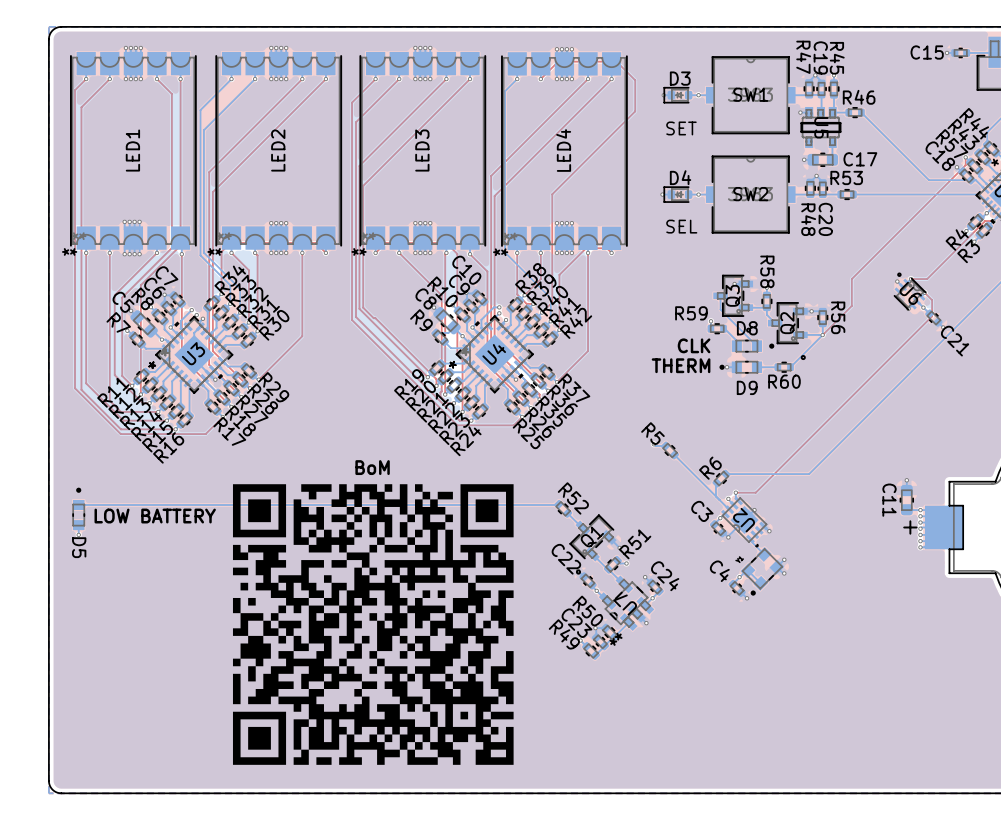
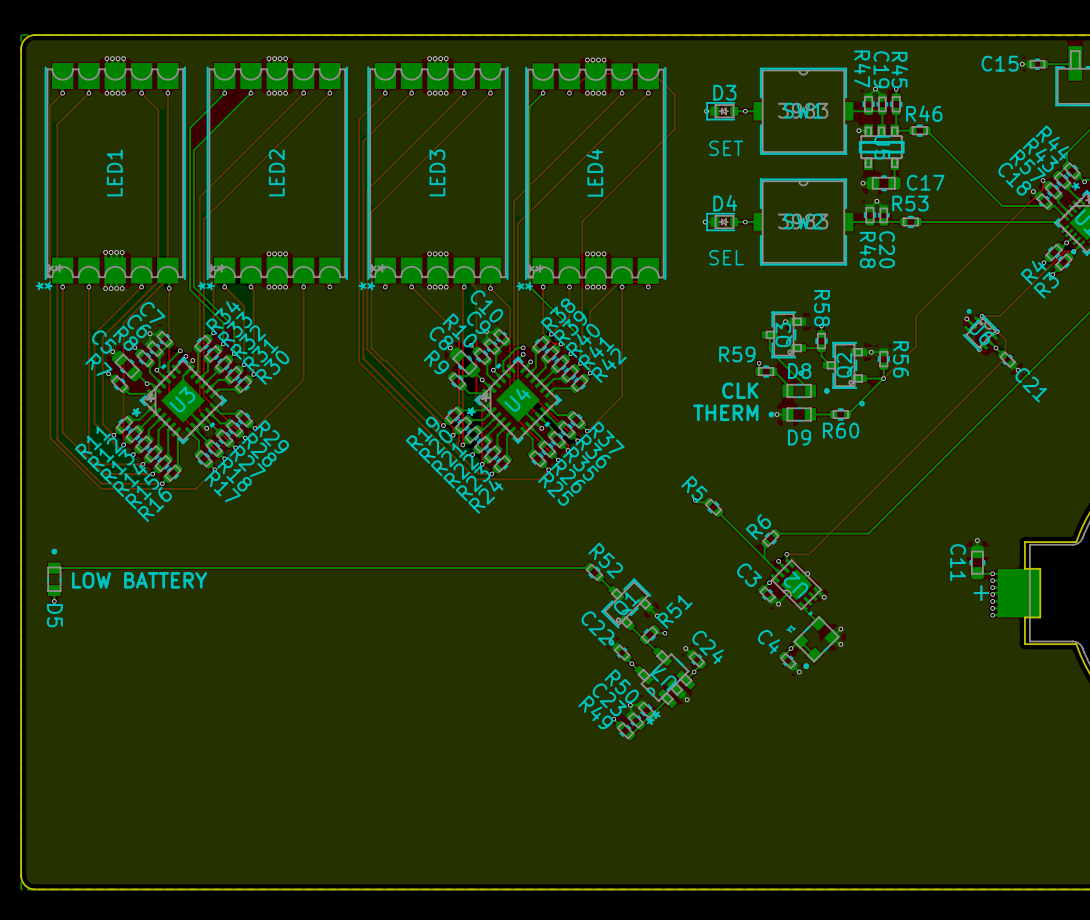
text: BoM (372, 467) -> none
drawing: [232, 484, 514, 765] -> none

